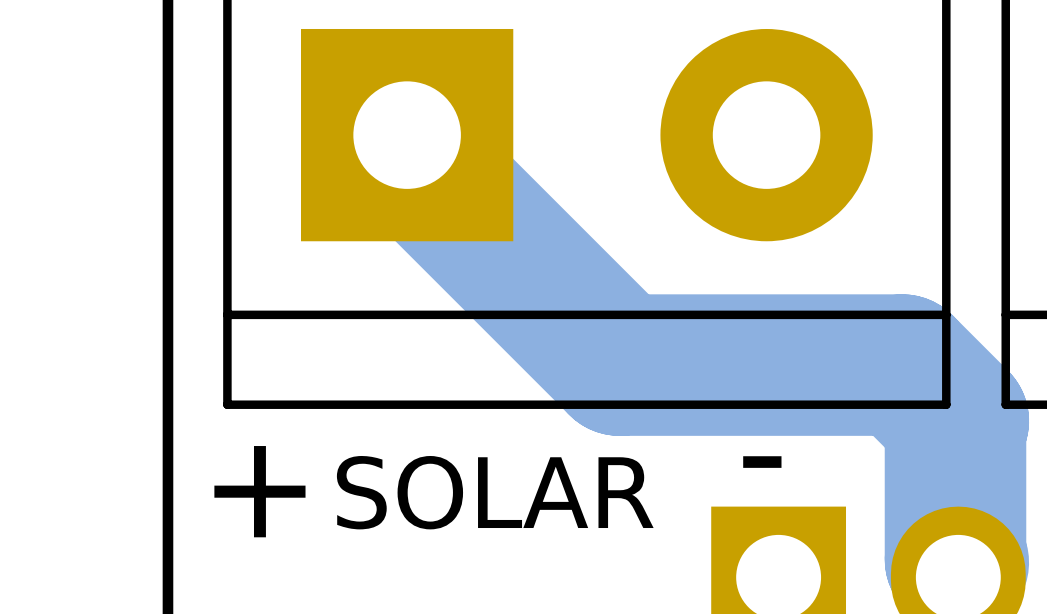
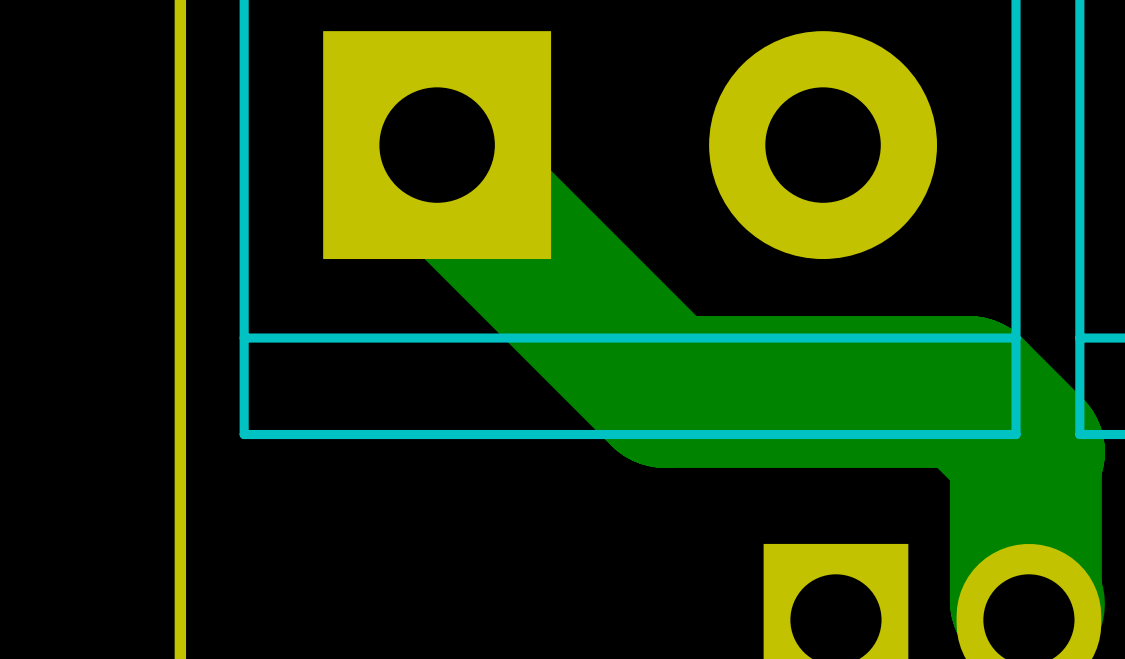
text: - (762, 462) -> none
text: + (259, 491) -> none
text: SOLAR (495, 492) -> none

